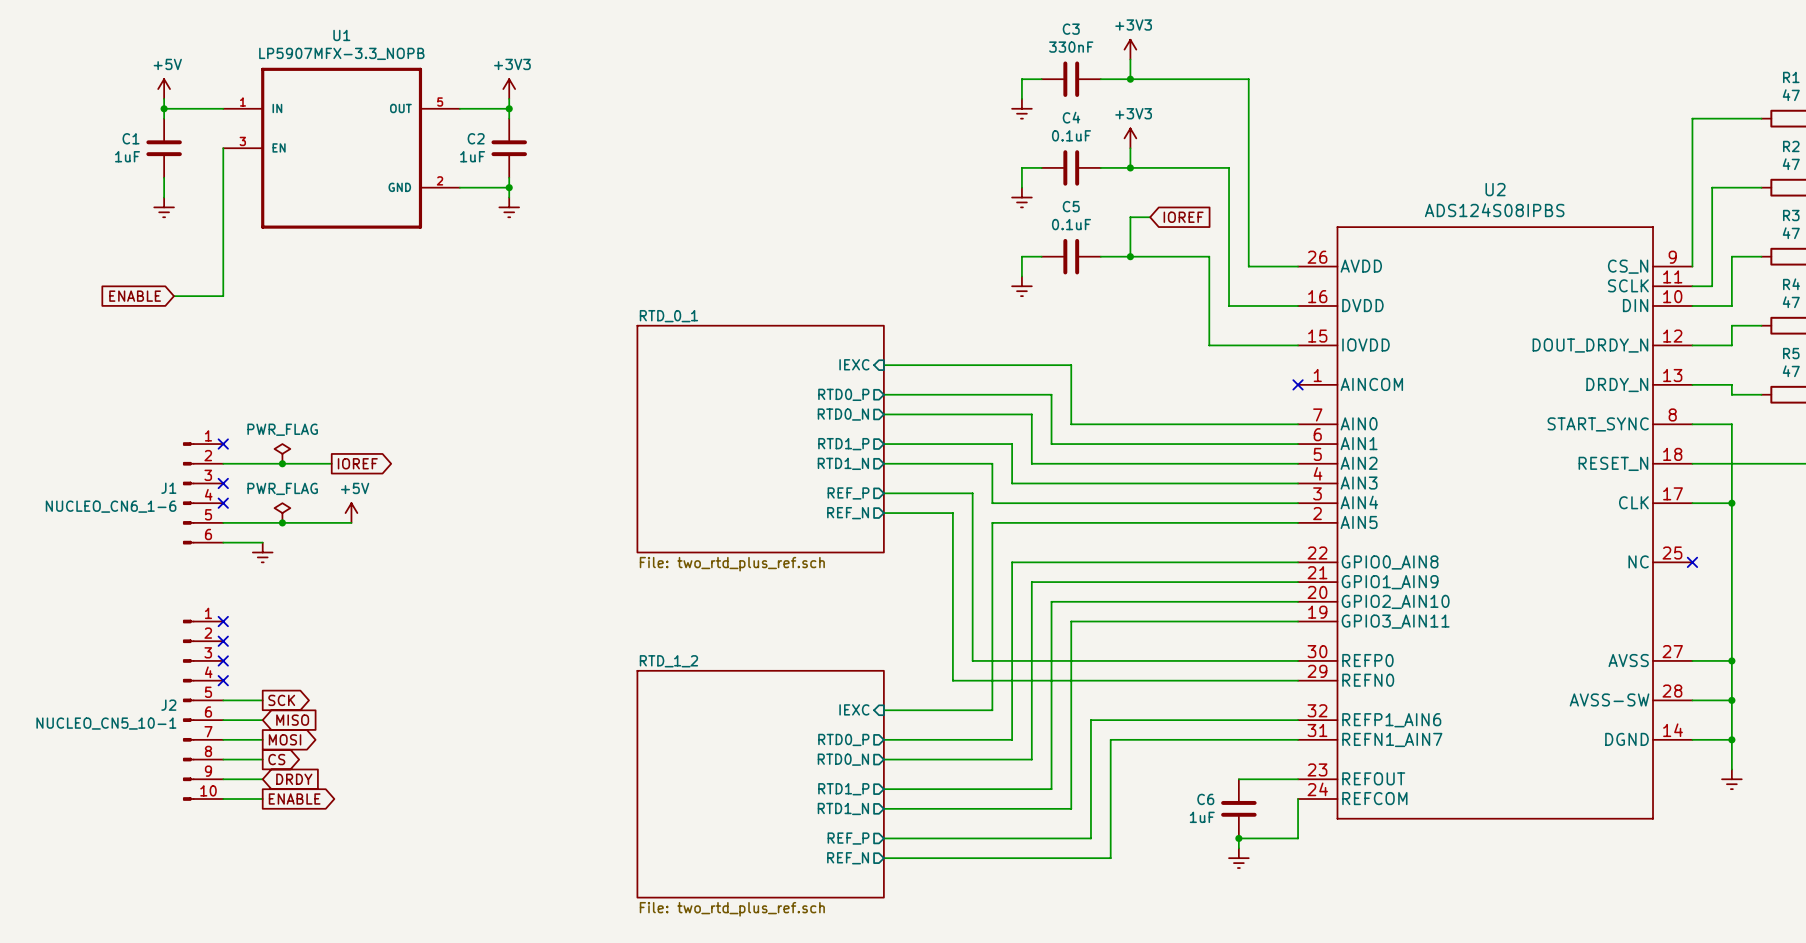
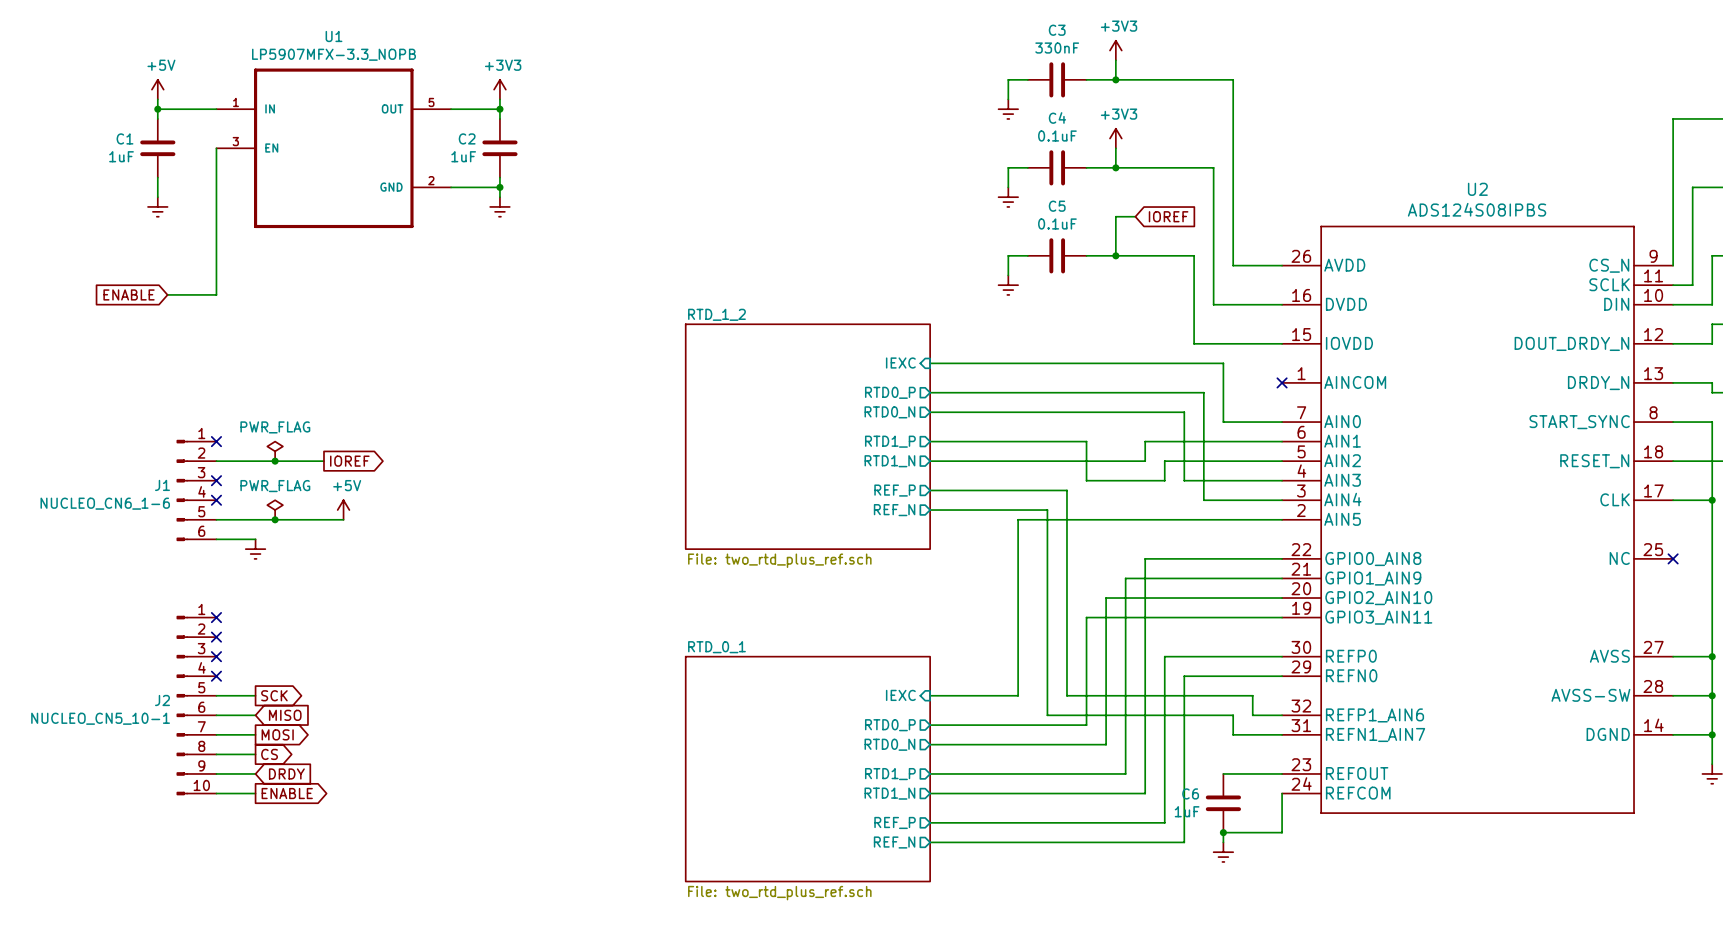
sheet pin position: IEXC (854, 364) -> IEXC (900, 363)
wire: (883, 365) (943, 365) -> none
wire: (1071, 365) (1071, 424) (1238, 424) -> (1057, 363) (1223, 363) (1223, 422)
sheet pin position: RTD0_P (843, 394) -> RTD0_P (890, 392)
wire: (883, 394) (943, 394) -> none
wire: (1051, 394) (1051, 444) -> none
sheet pin position: RTD0_N (843, 414) -> RTD0_N (889, 412)
wire: (883, 414) (943, 414) -> none
wire: (1031, 414) (1031, 463) -> (979, 461) (1018, 461)
wire: none -> (1018, 412) (1184, 412) (1184, 480)
sheet RTD_0_1 position: (760, 439) -> (807, 769)
sheet pin position: RTD1_P (843, 444) -> RTD1_P (890, 441)
wire: (883, 444) (943, 444) -> none
wire: (1012, 444) (1012, 483) (1100, 483) -> (998, 441) (1037, 441)
wire: (1100, 444) (1159, 444) -> (1086, 441) (1086, 480)
sheet pin position: RTD1_N (843, 463) -> RTD1_N (889, 461)
wire: (883, 463) (943, 463) -> none
wire: (992, 463) (992, 503) (1219, 503) -> (1037, 392) (1203, 392) (1203, 500)
wire: (1159, 463) (1179, 463) -> (1145, 461) (1145, 441)
wire: (1179, 483) (1199, 483) -> (1164, 480) (1164, 461)
sheet pin position: REF_P (848, 493) -> REF_P (895, 490)
wire: (883, 493) (943, 493) -> none
wire: (972, 493) (972, 660) (1179, 660) -> (959, 490) (1066, 490) (1066, 695) (1252, 695) (1252, 715)
sheet pin position: REF_N (848, 513) -> REF_N (894, 510)
wire: (883, 513) (943, 513) -> none
wire: (952, 513) (952, 680) (1199, 680) -> (939, 510) (1047, 510) (1047, 715) (1076, 715)
wire: (1031, 522) (992, 522) (992, 710) (883, 710) -> none
wire: (1159, 562) (1012, 562) (1012, 739) (883, 739) -> (1145, 558) (1145, 793) (930, 793)
wire: (1031, 582) (1140, 582) -> (1018, 578) (1018, 519)
wire: none -> (1125, 578) (1125, 773) (930, 773)
wire: (1120, 601) (1051, 601) (1051, 789) (883, 789) -> (1106, 598) (1106, 744) (930, 744)
wire: (1100, 621) (1071, 621) (1071, 808) (883, 808) -> (1086, 617) (1086, 725) (930, 725)
wire: none -> (1164, 656) (1164, 822) (930, 822)
wire: none -> (1184, 676) (1184, 842) (930, 842)
wire: (1031, 700) (1031, 759) (883, 759) -> (1018, 695) (930, 695)
sheet pin position: IEXC (854, 709) -> IEXC (900, 695)
wire: (1090, 720) (1090, 838) (883, 838) -> none
wire: (1248, 720) (1268, 720) -> (1233, 715) (1233, 734)
sheet pin position: RTD0_P (843, 739) -> RTD0_P (890, 725)
wire: (1248, 739) (1110, 739) (1110, 858) (883, 858) -> none
sheet pin position: RTD0_N (843, 759) -> RTD0_N (889, 744)
sheet RTD_1_2 position: (760, 784) -> (807, 436)
sheet pin position: RTD1_P (843, 789) -> RTD1_P (890, 774)
sheet pin position: RTD1_N (843, 808) -> RTD1_N (889, 793)
sheet pin position: REF_P (848, 838) -> REF_P (895, 822)
sheet pin position: REF_N (848, 858) -> REF_N (894, 842)

